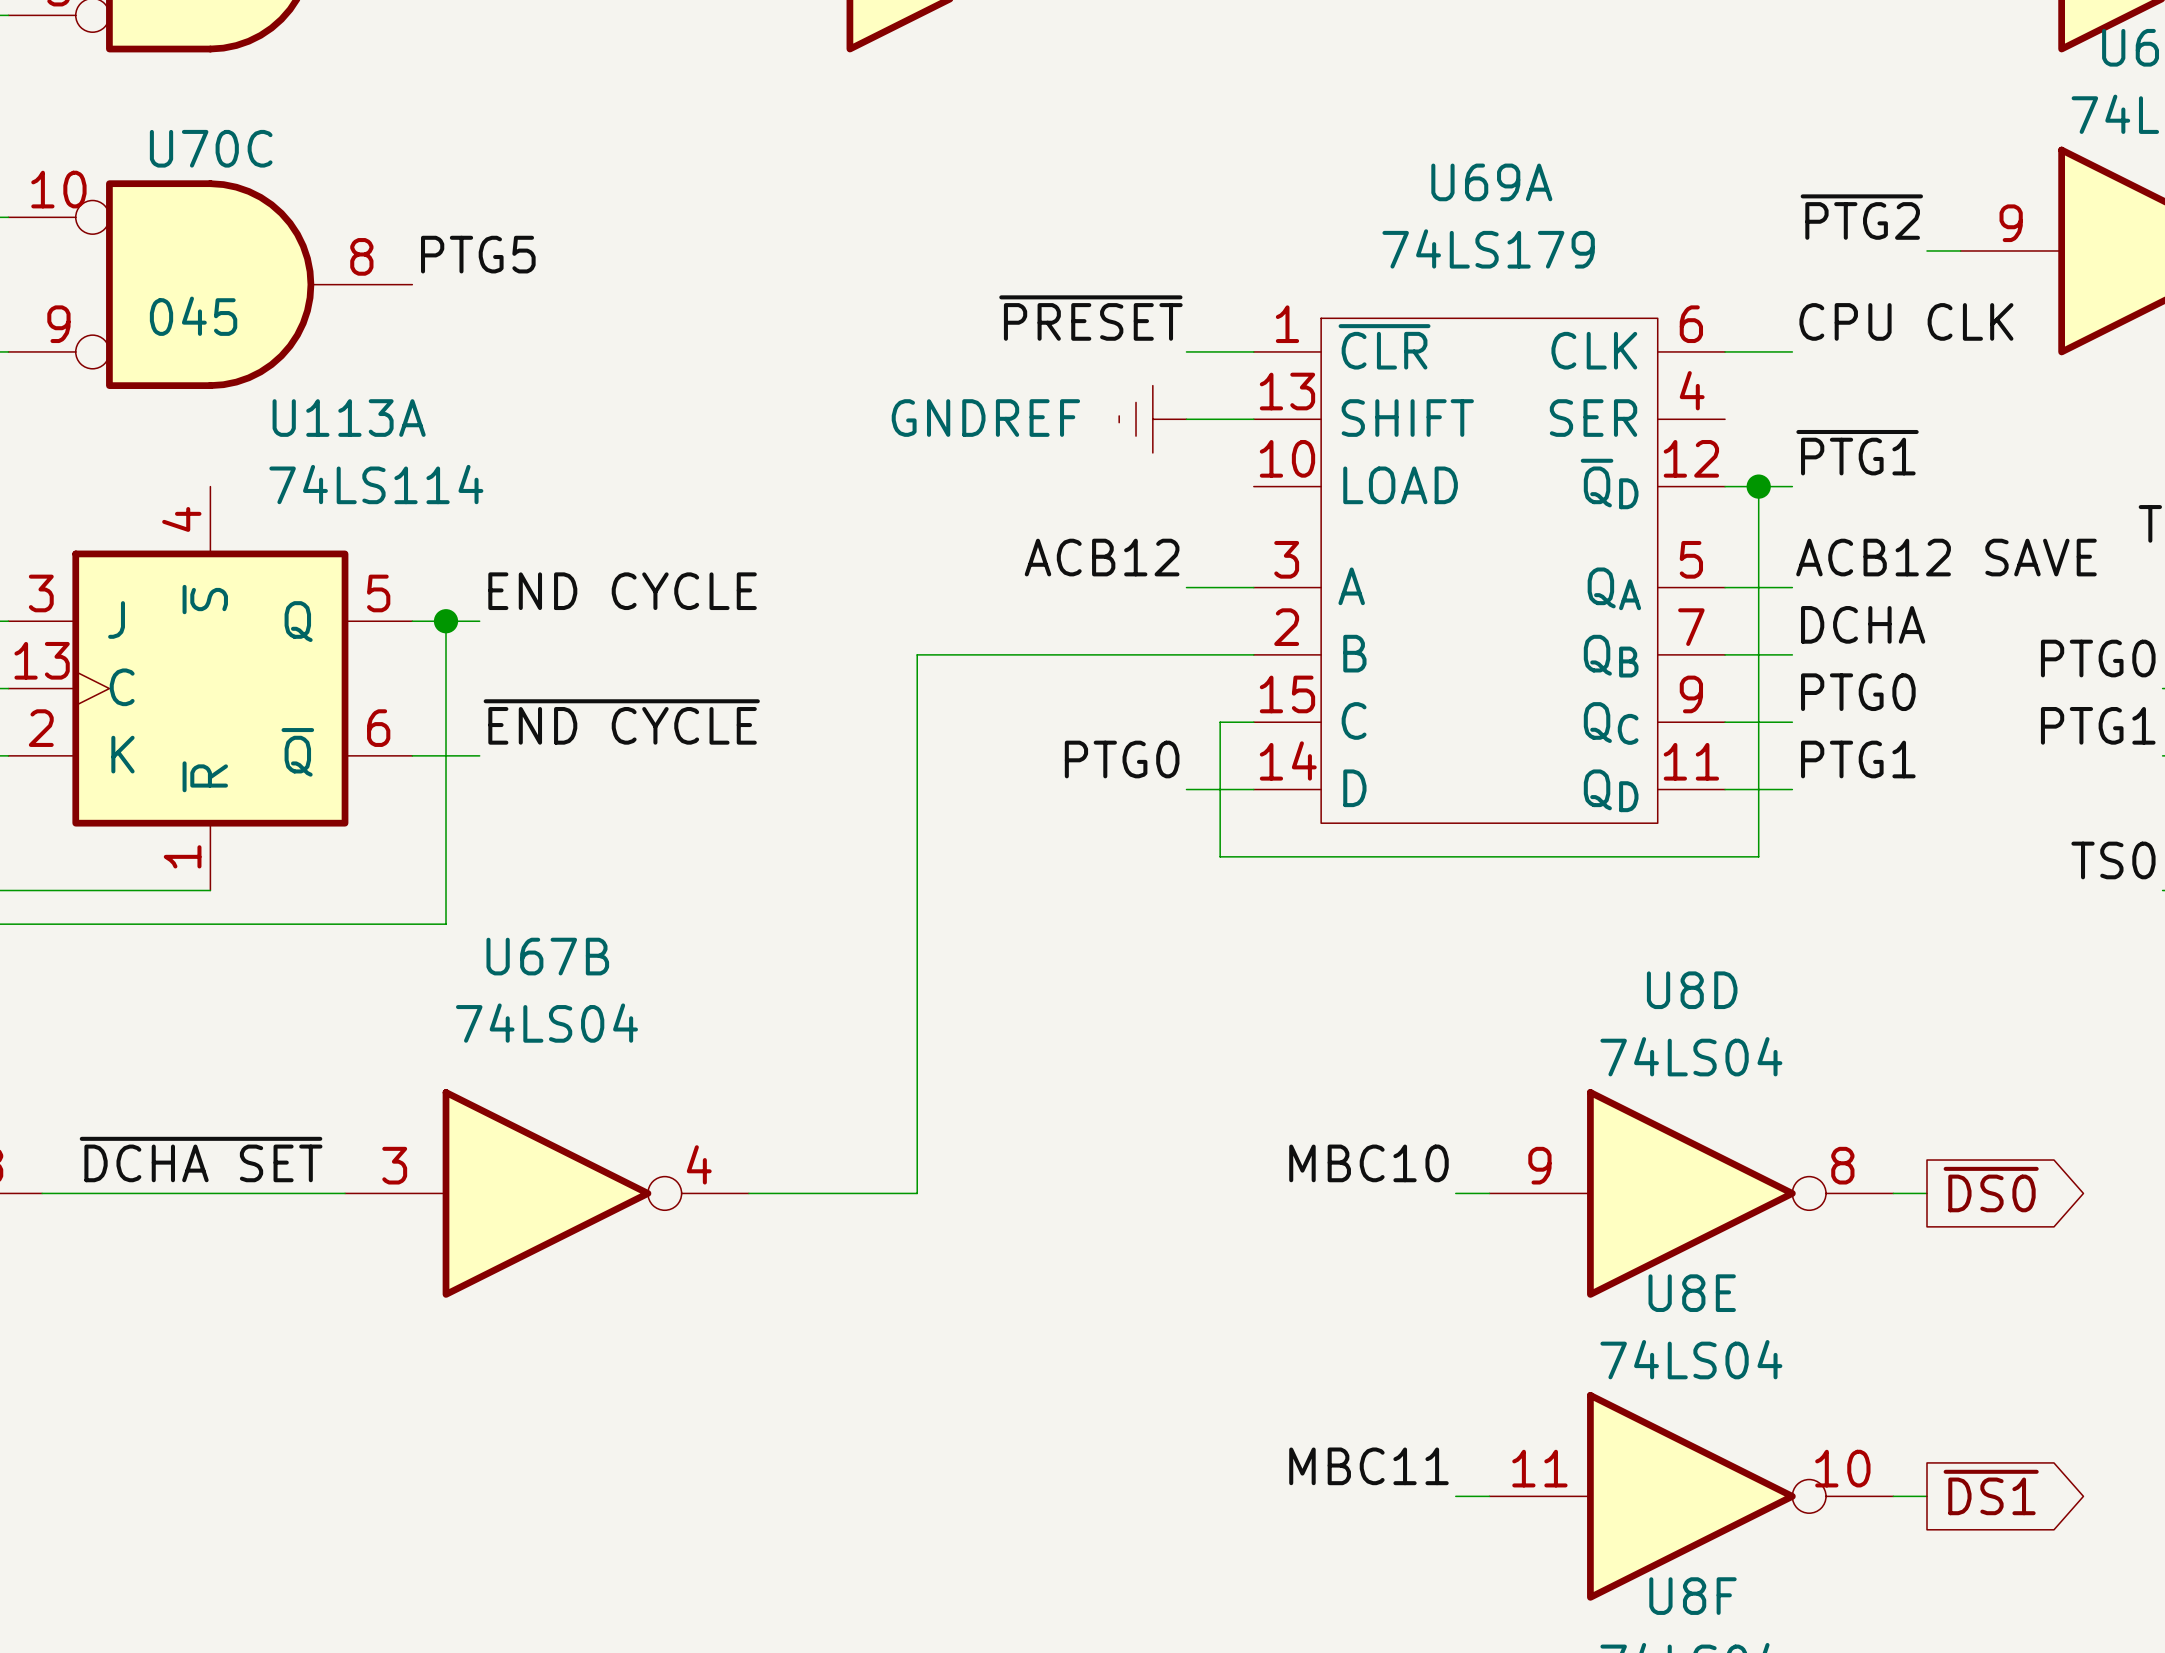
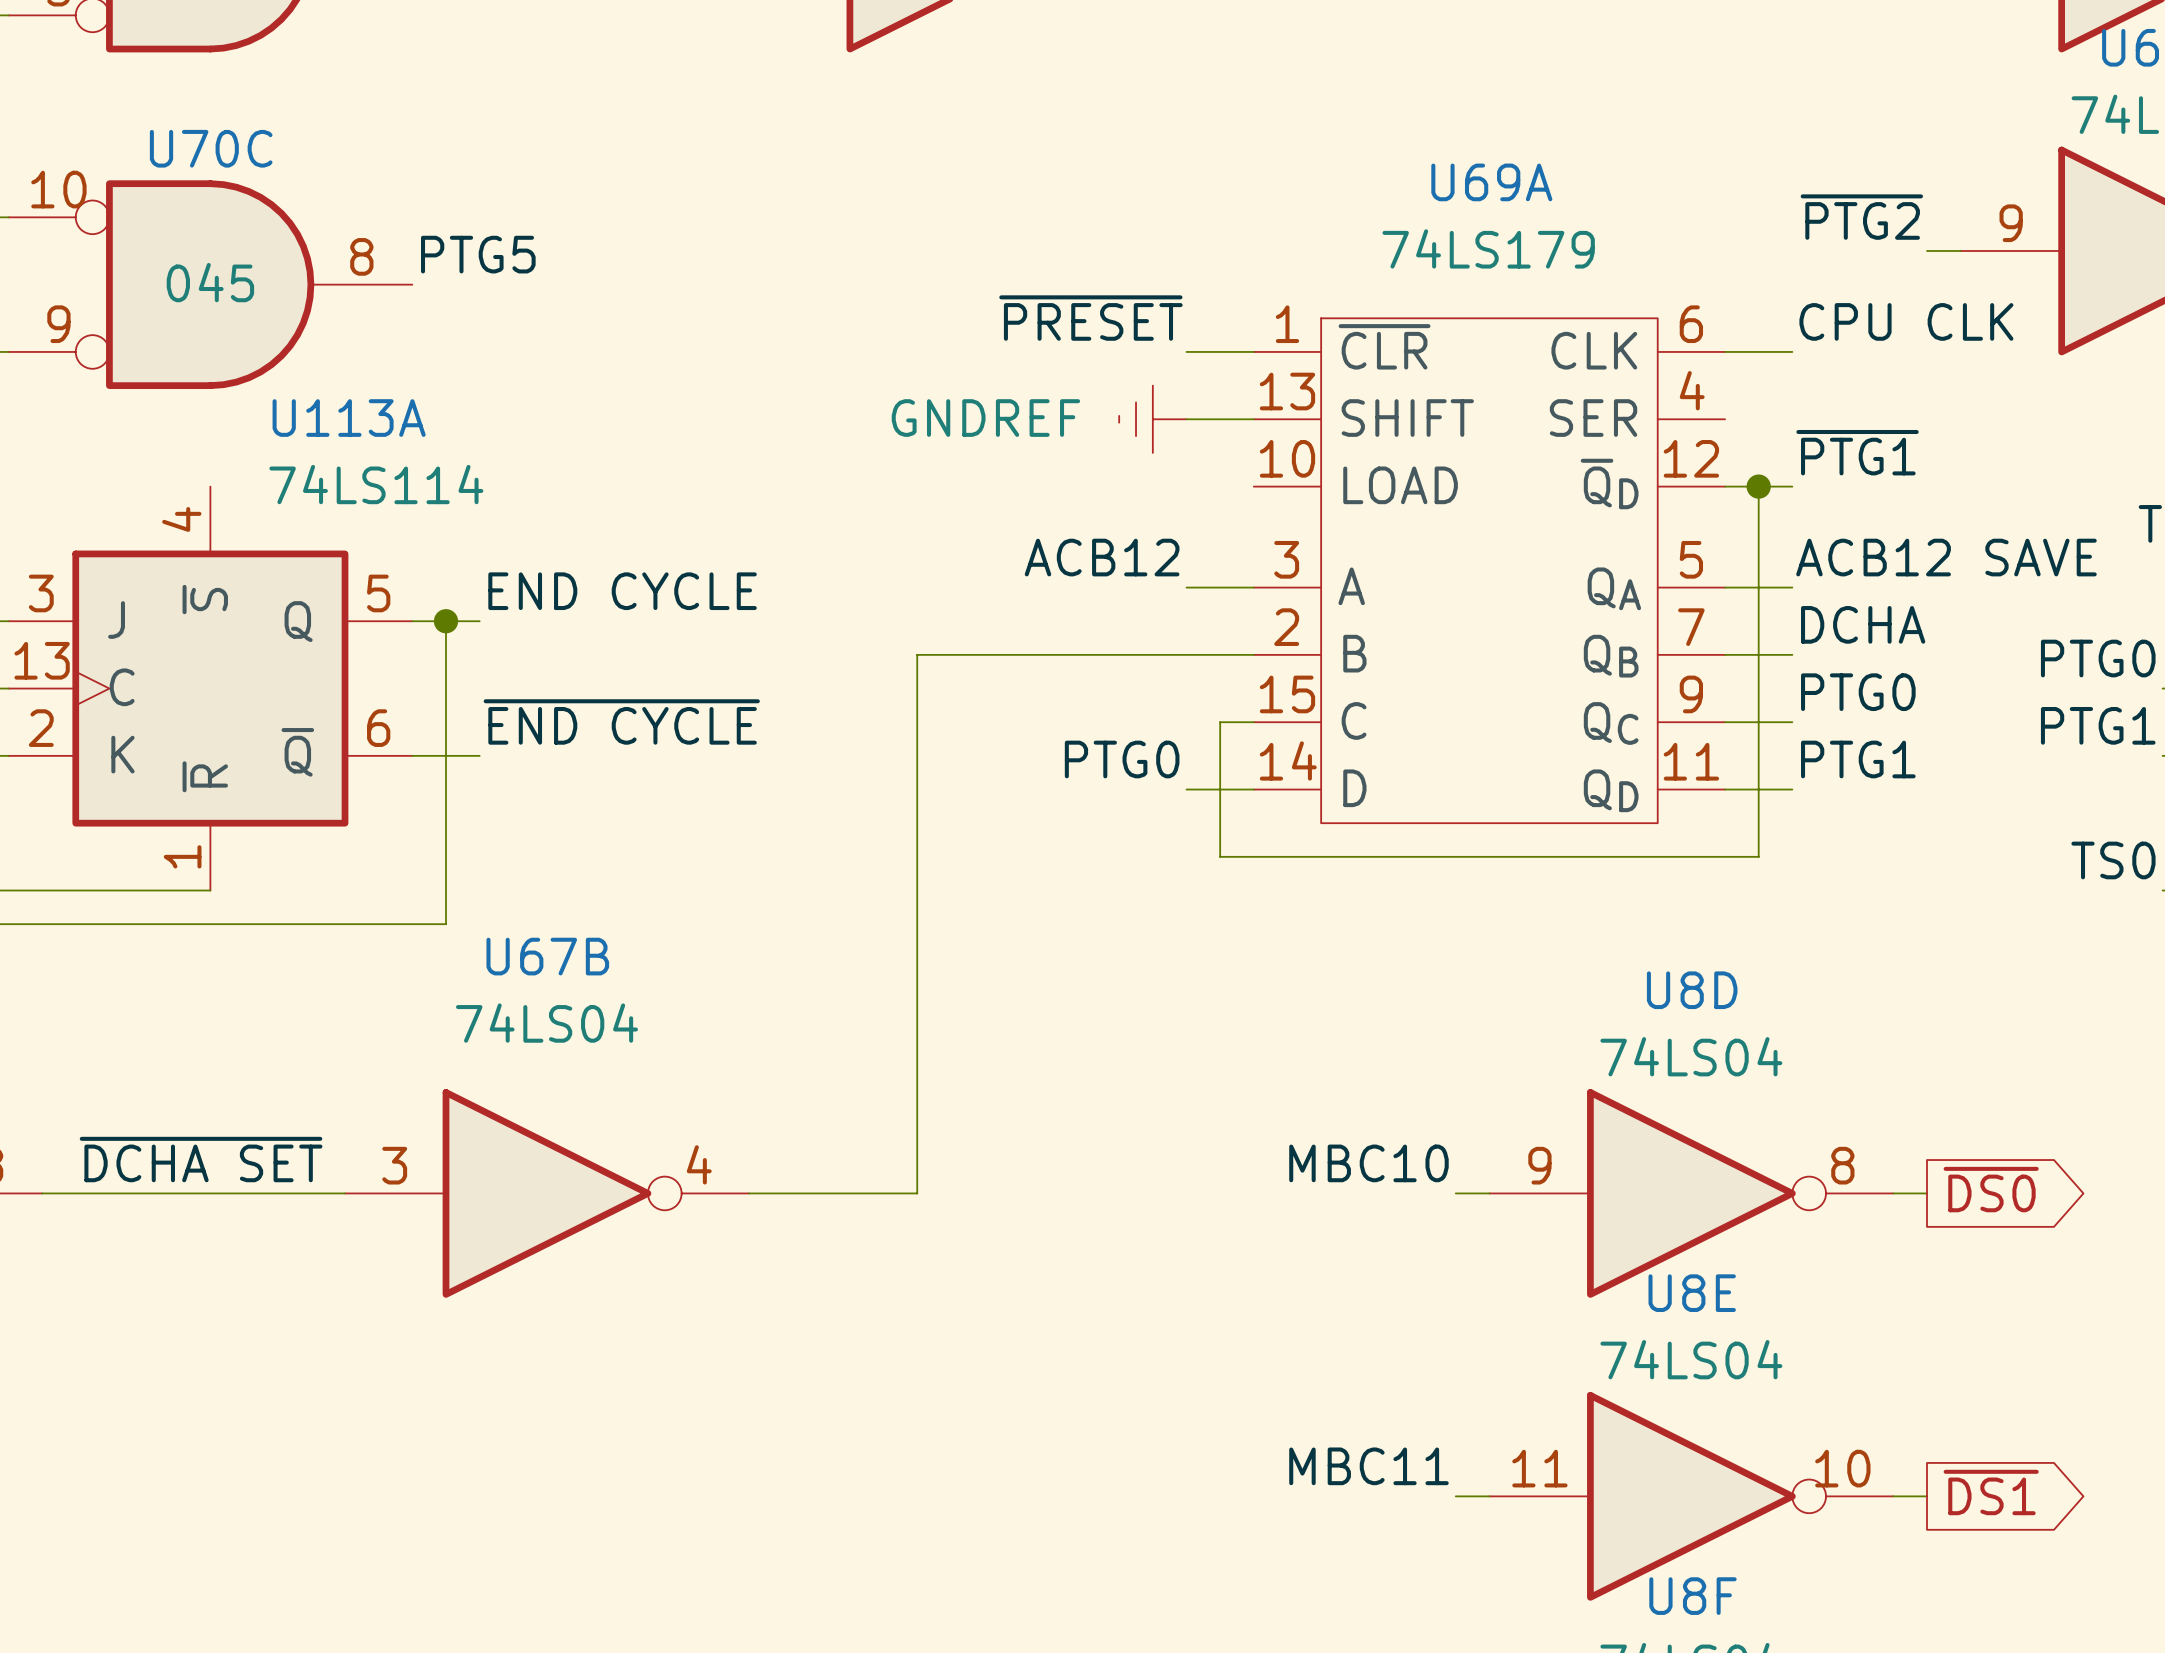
U70C value position: 045 (193, 316) -> 045 (210, 282)

